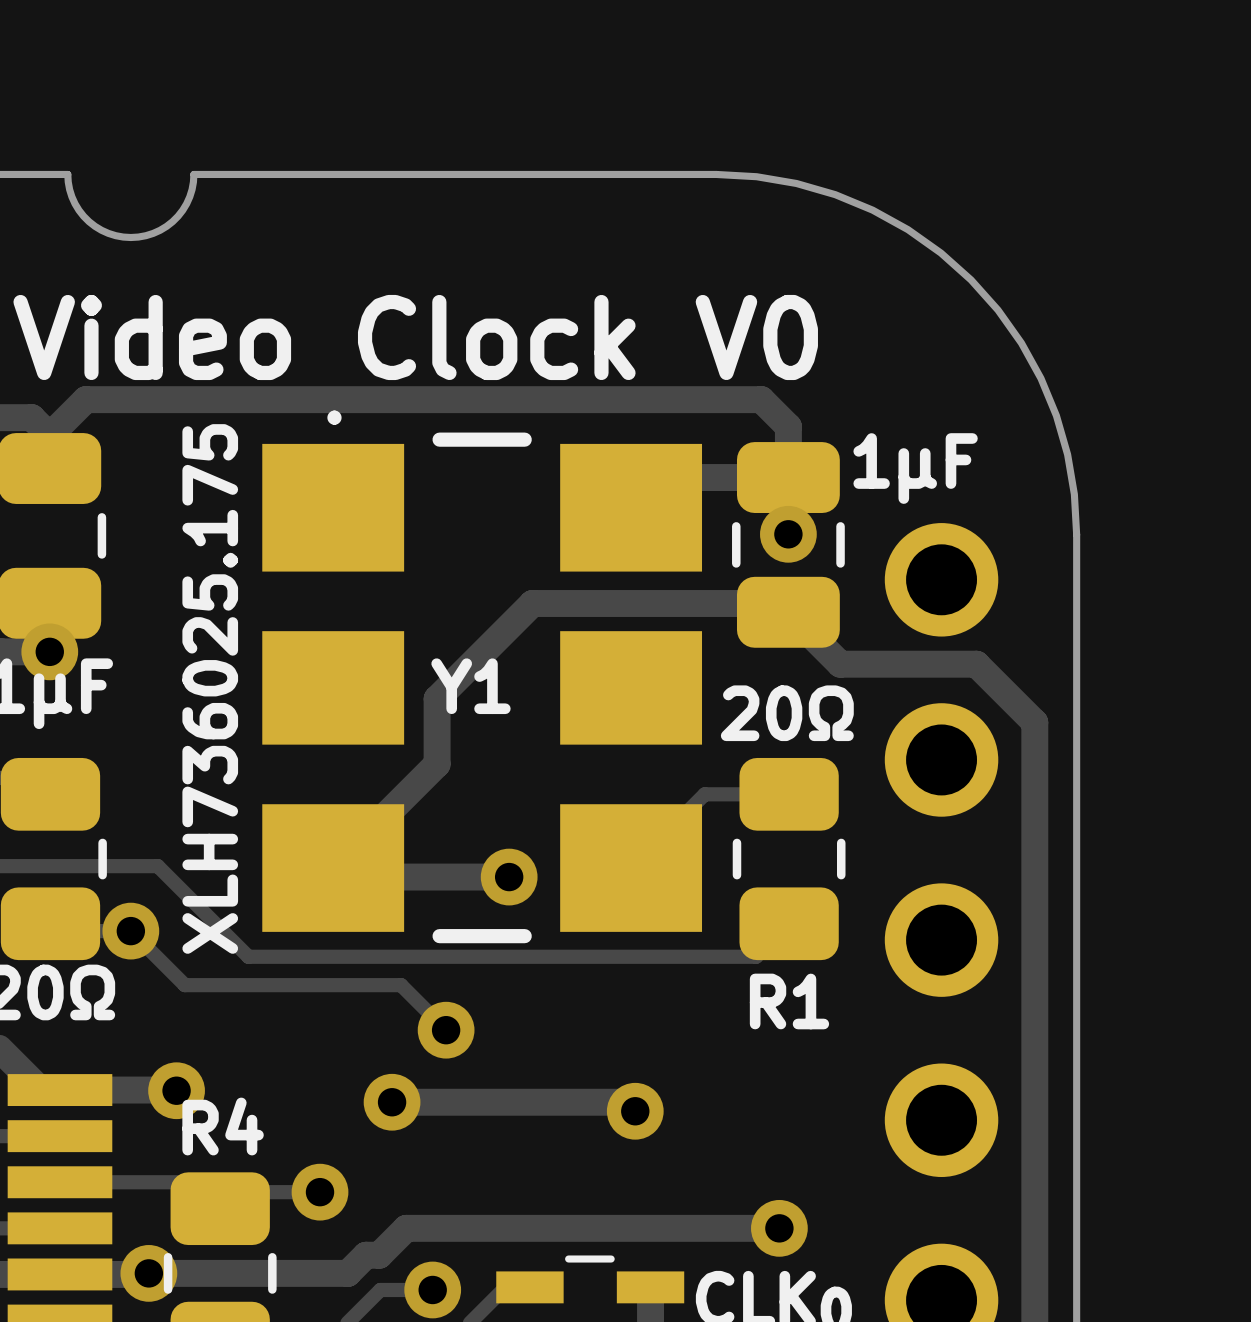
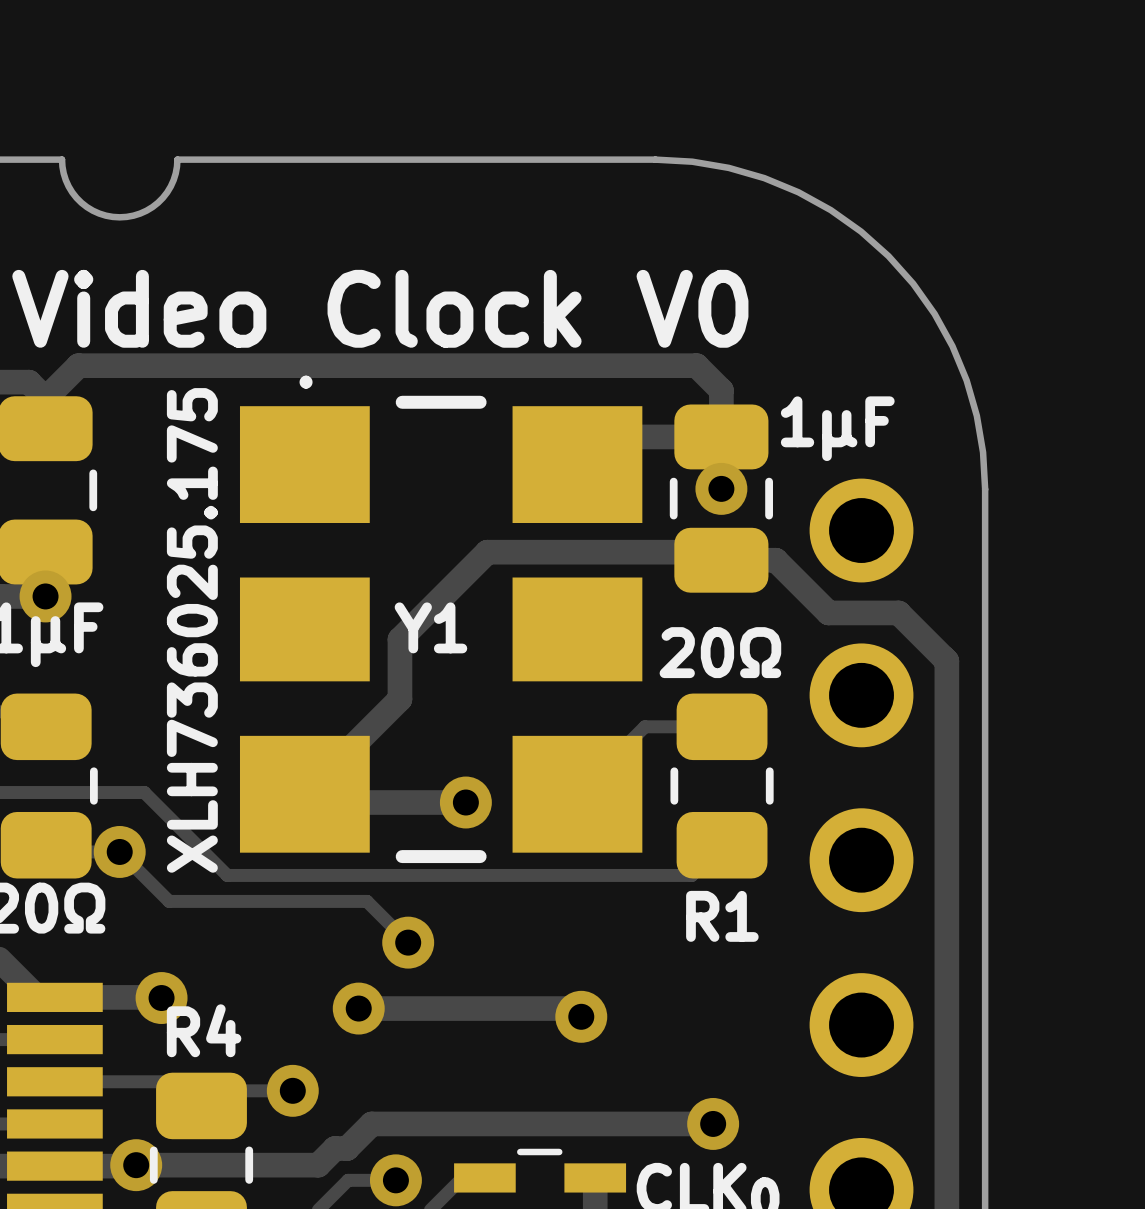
track: (788, 612) (840, 664) (976, 664) (982, 669) -> (721, 560) (775, 560) (828, 612) (898, 612)

